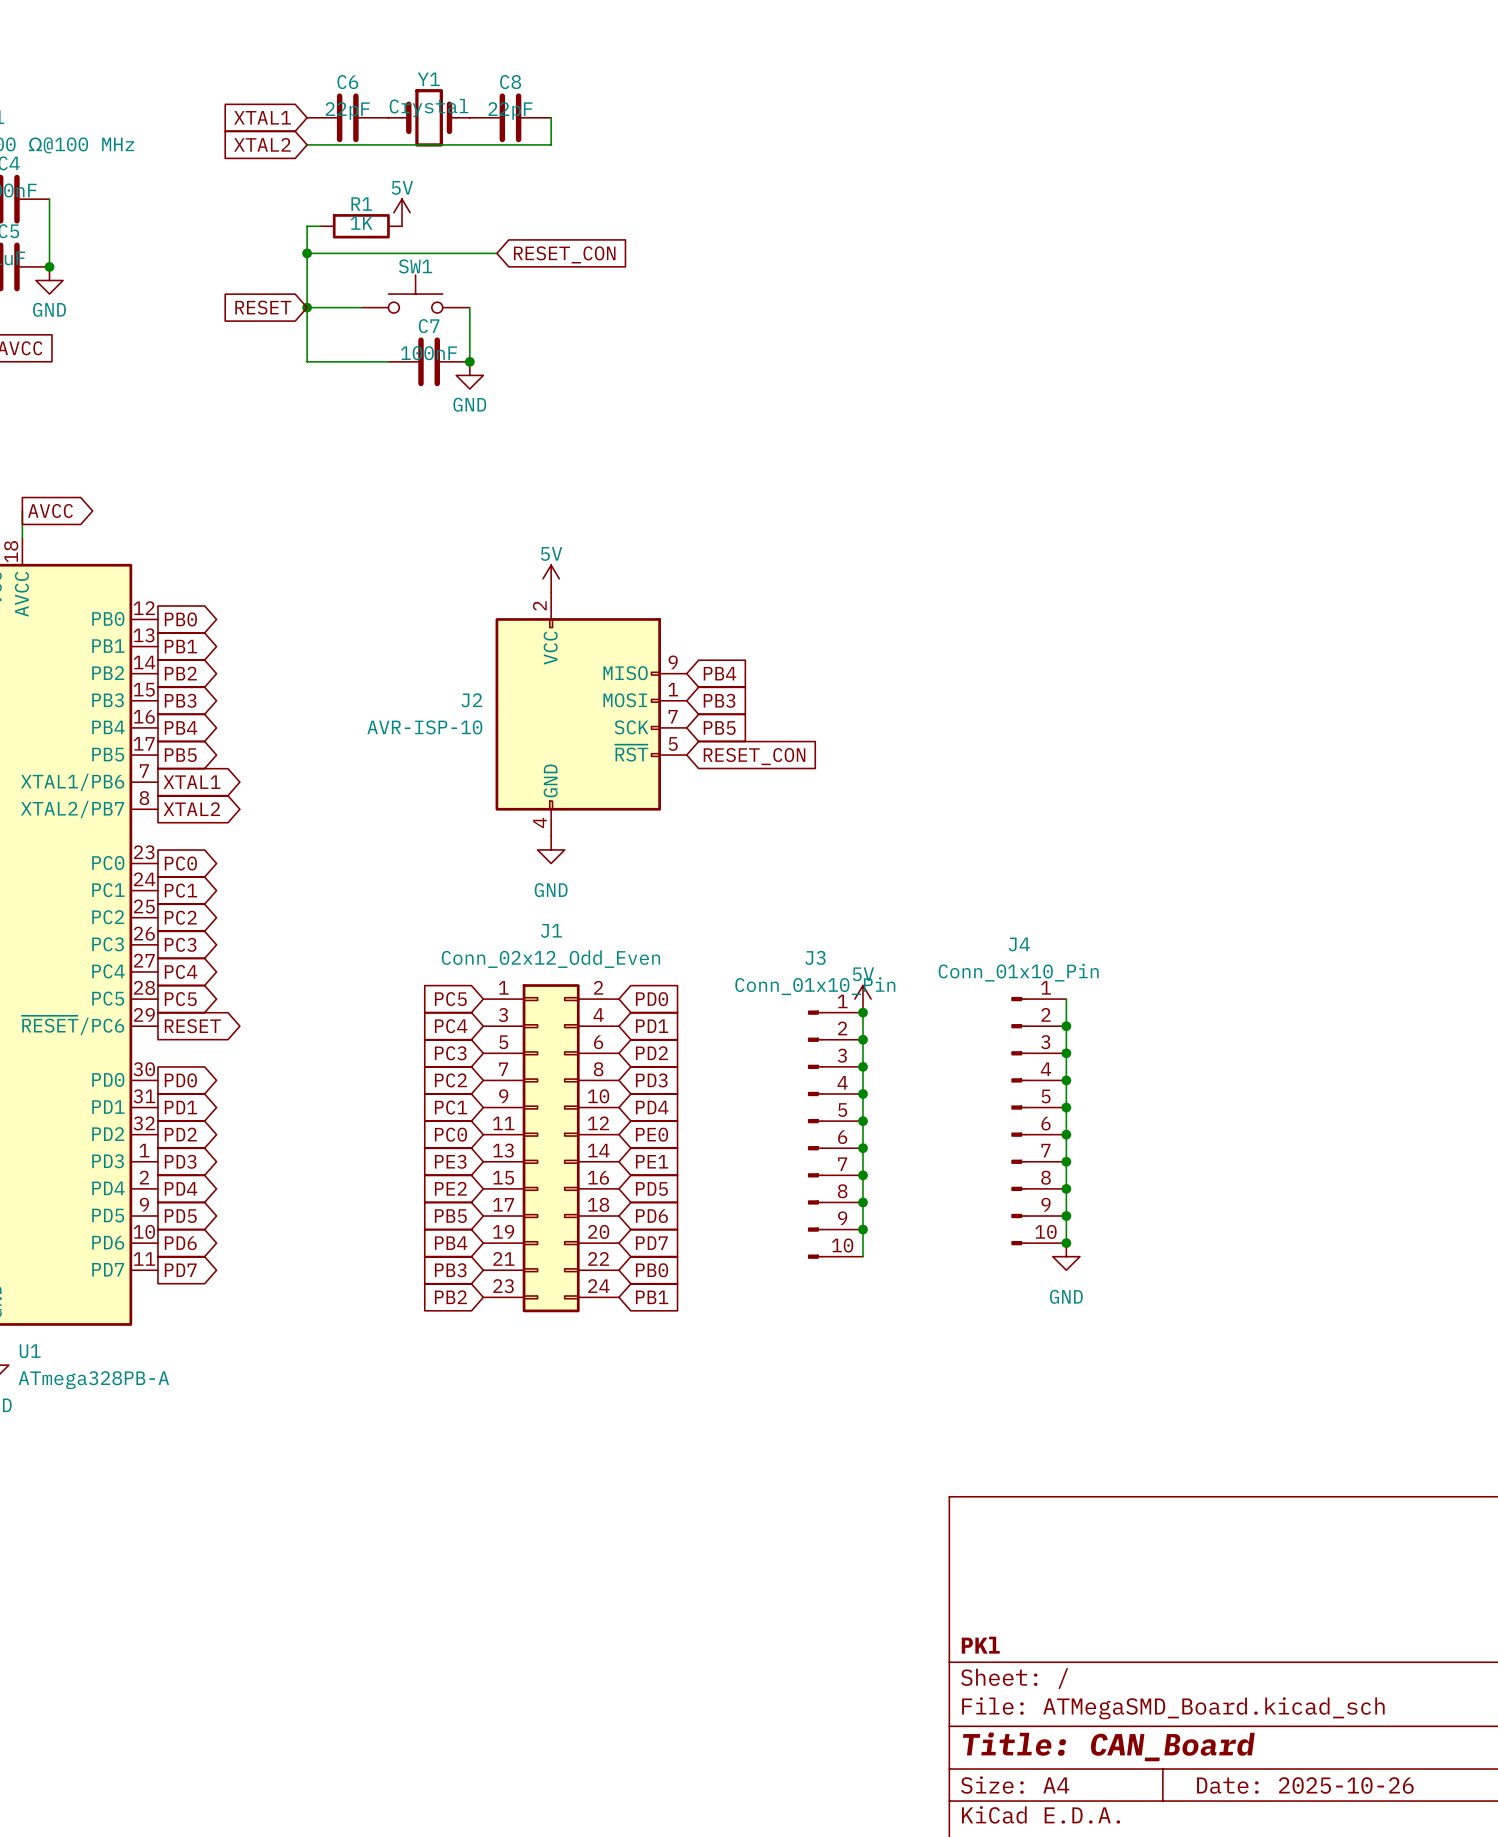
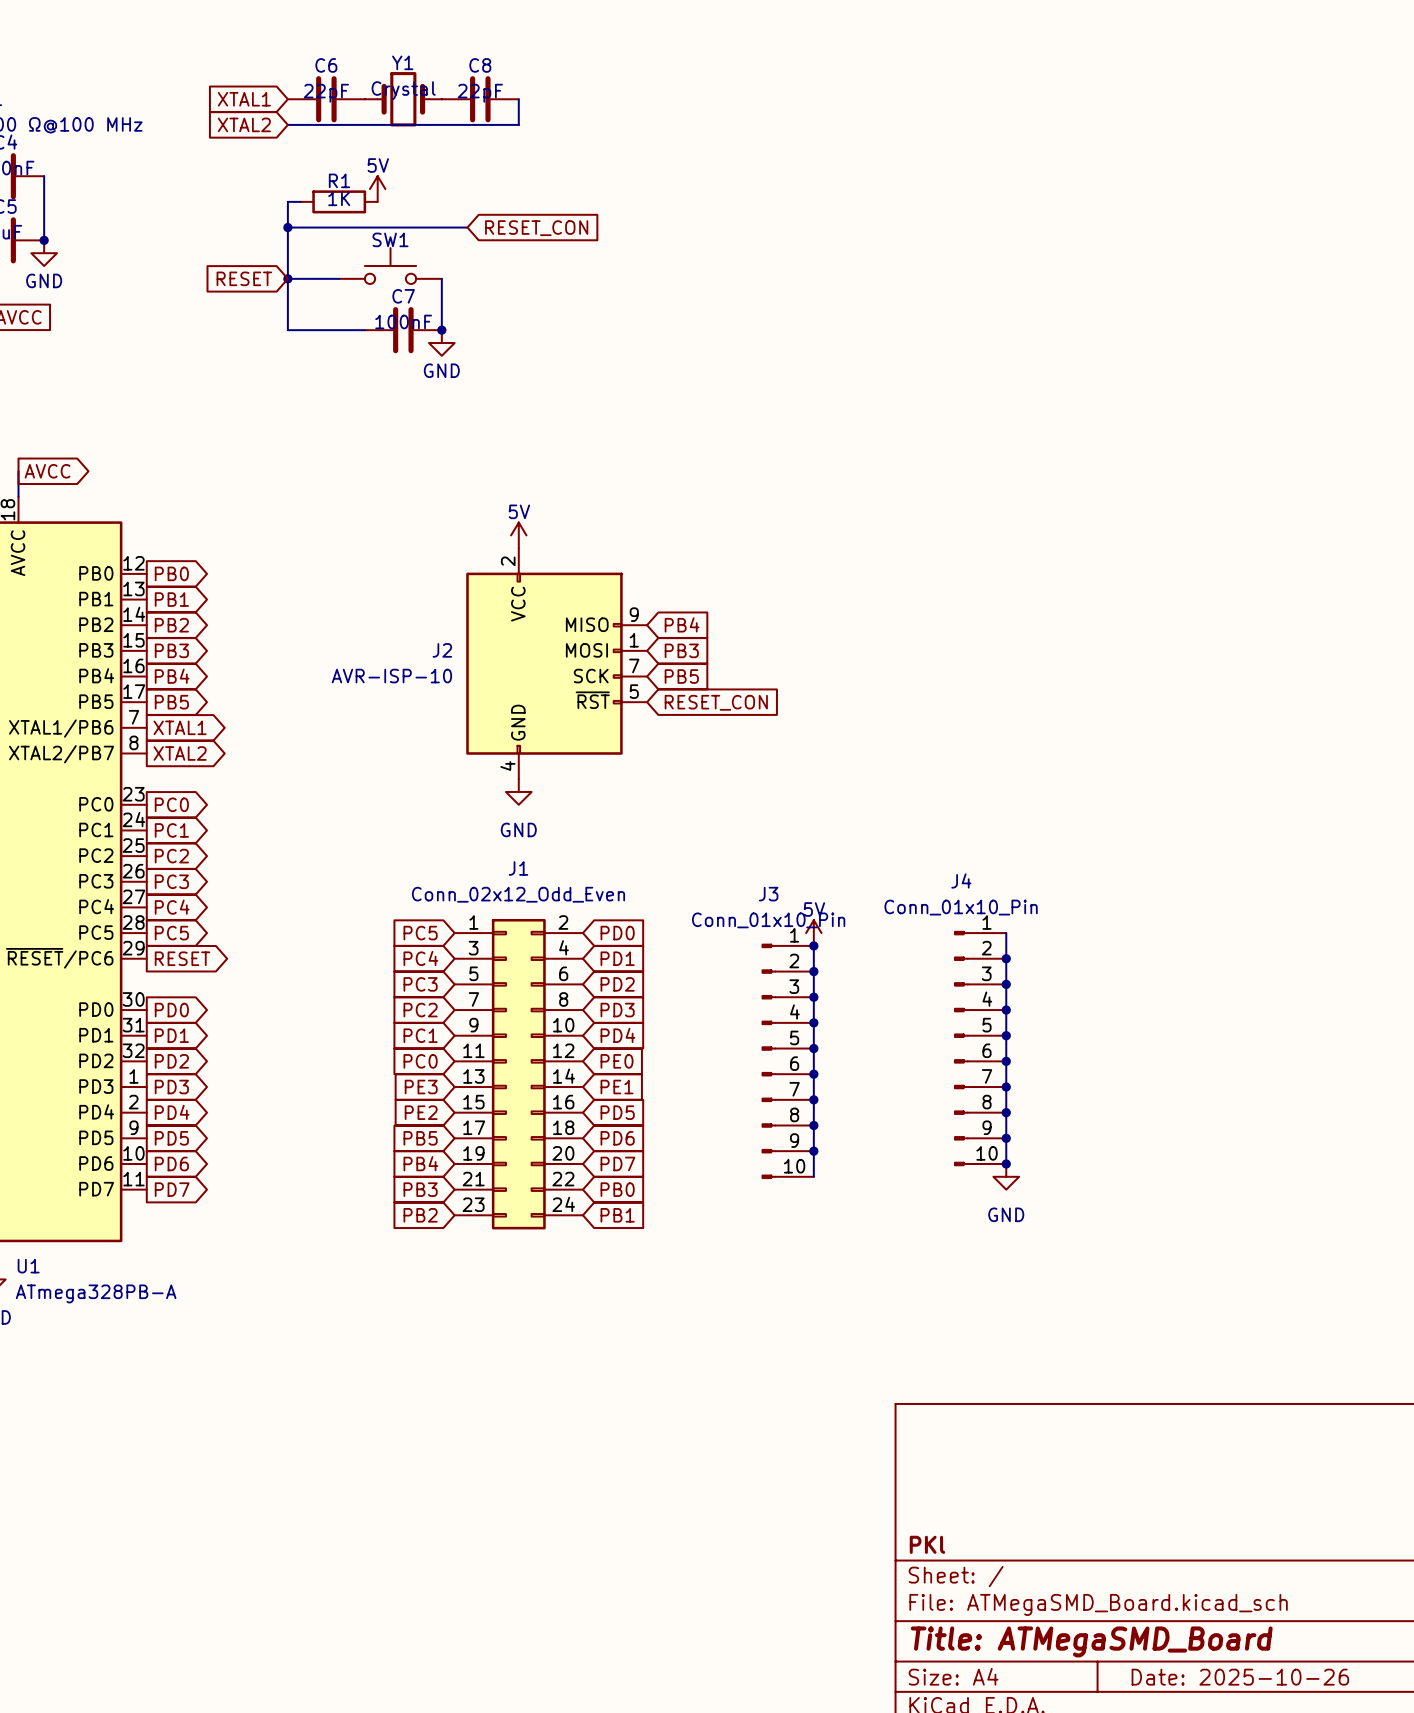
title block: Title: CAN_Board (1108, 1746) -> Title: ATMegaSMD_Board (1091, 1641)

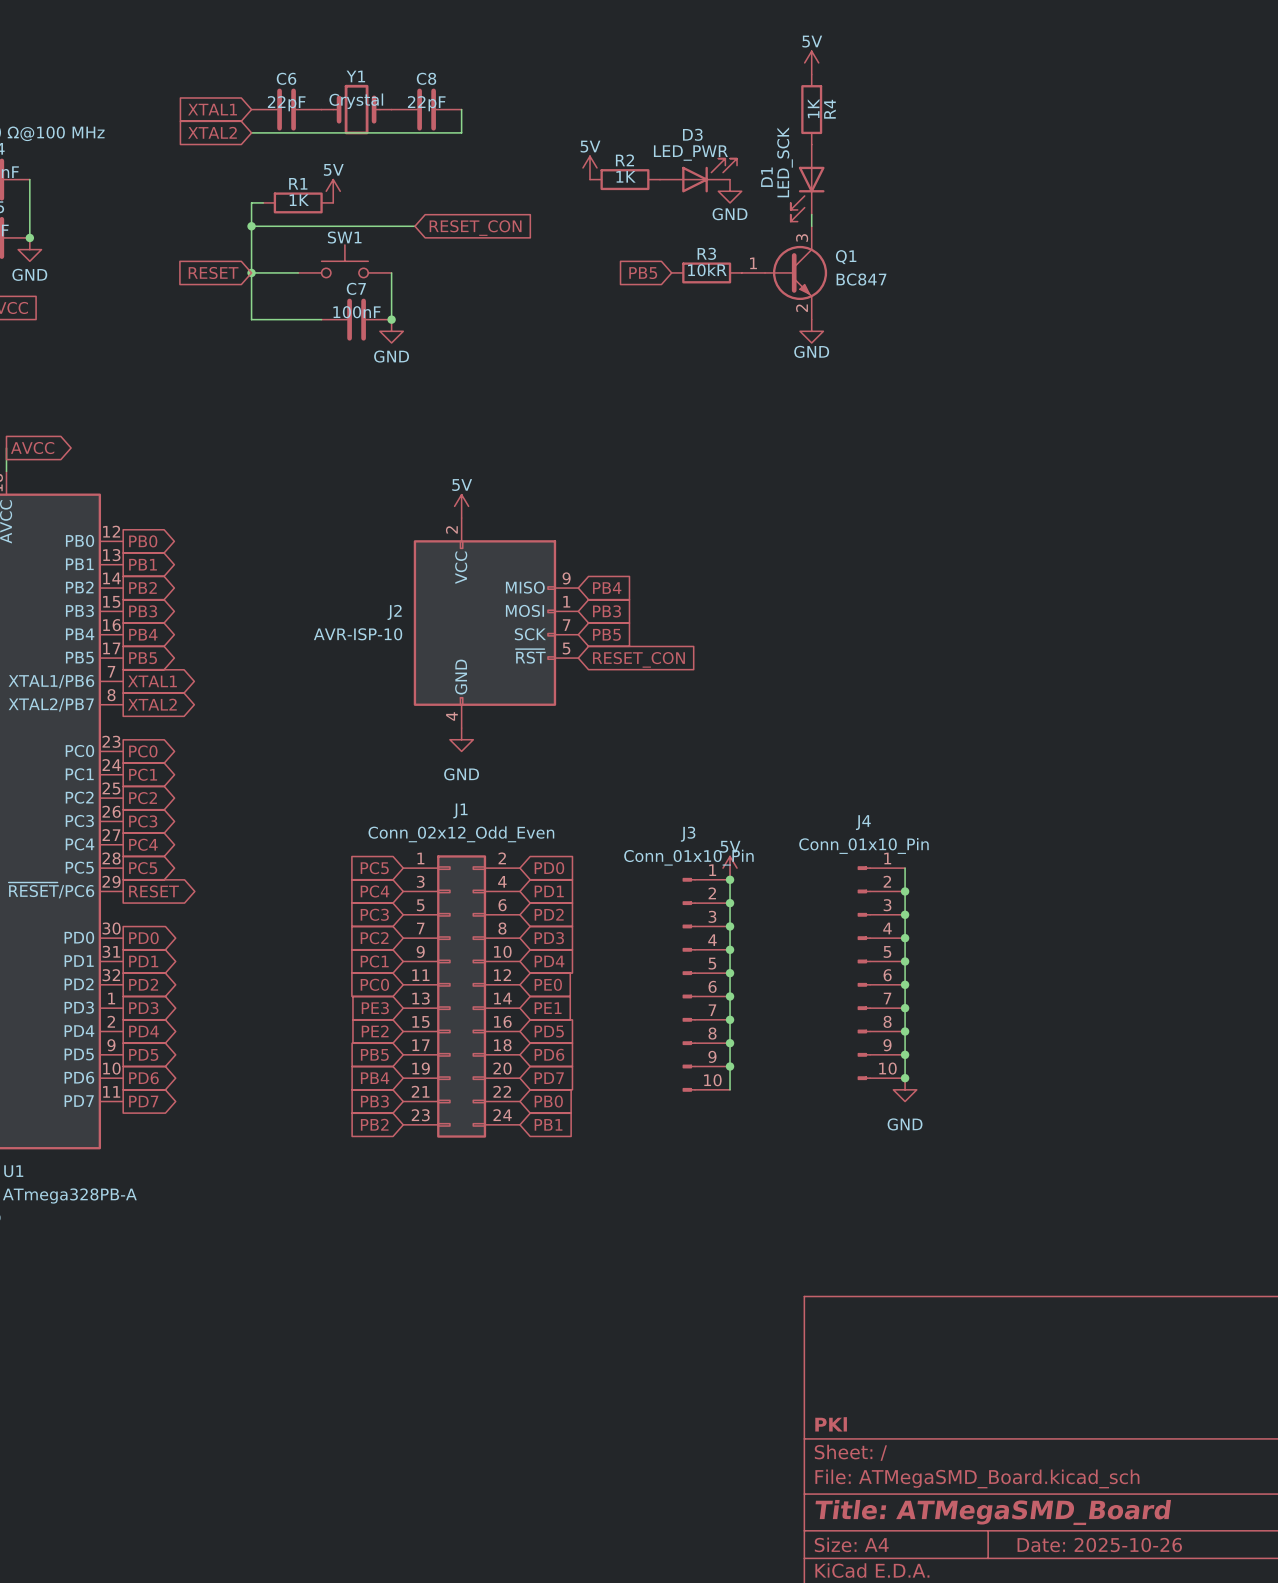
power symbol: none -> 5V (811, 62)
R4: none -> 1K (811, 109)
power symbol: none -> 5V (589, 167)
D3: none -> LED_PWR (698, 175)
R2: none -> 1K (624, 179)
D1: none -> LED_SCK (807, 183)
power symbol: none -> GND (730, 191)
wire: none -> (811, 214) (811, 226)
global label: none -> PB5 (643, 273)
R3: none -> 10kR (706, 272)
Q1: none -> BC847 (784, 272)
power symbol: none -> GND (811, 331)

